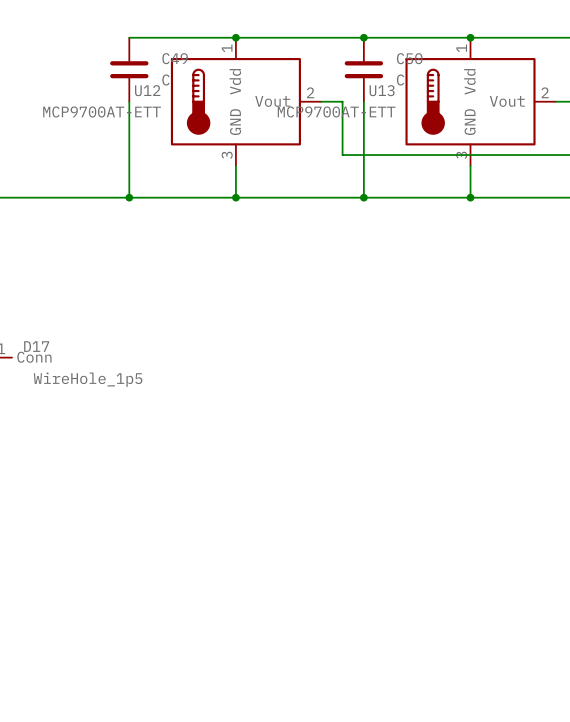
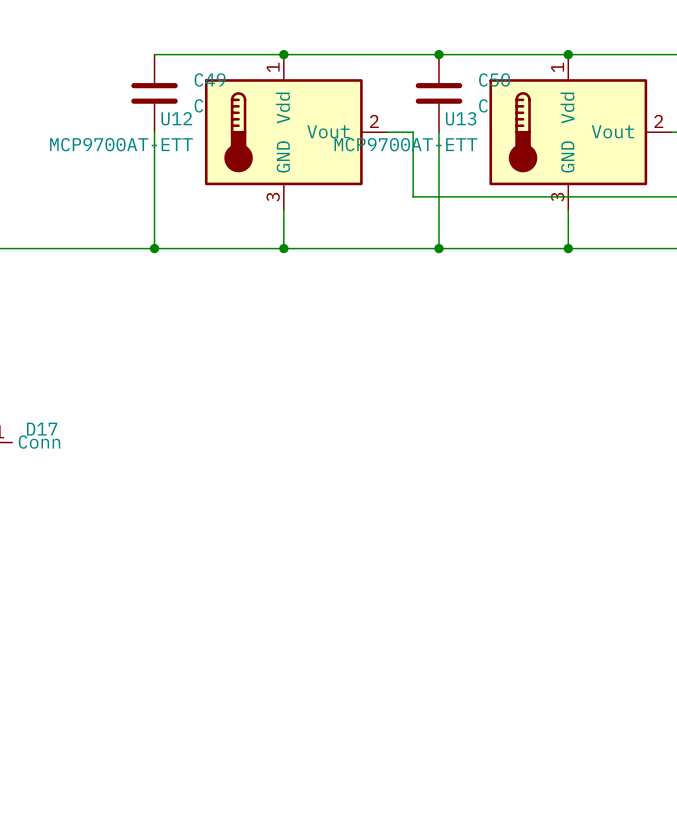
D17 value: WireHole_1p5 (88, 379) -> none

